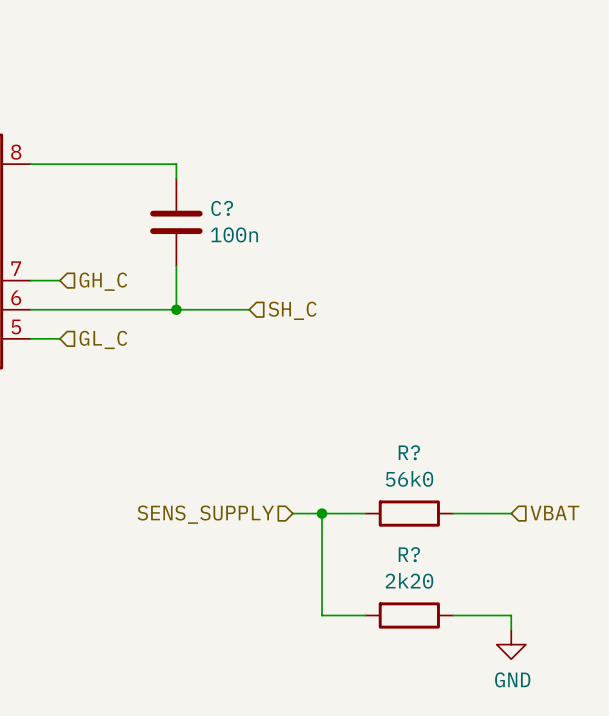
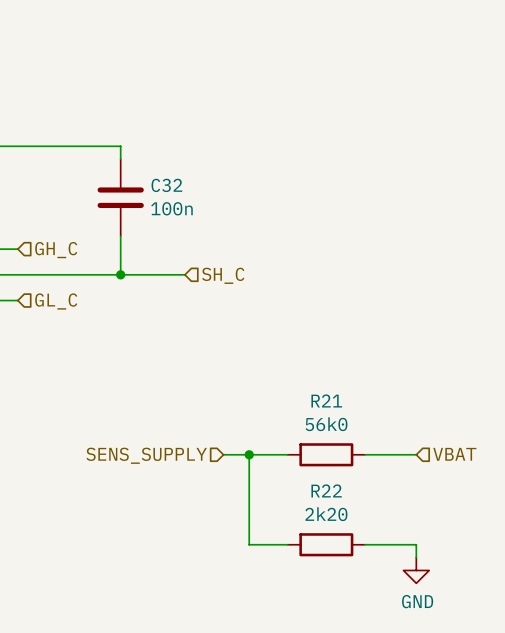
C? name: C? (222, 208) -> C32 (166, 185)
R? name: R? (409, 452) -> R21 (326, 400)
R? name: R? (409, 554) -> R22 (326, 490)

